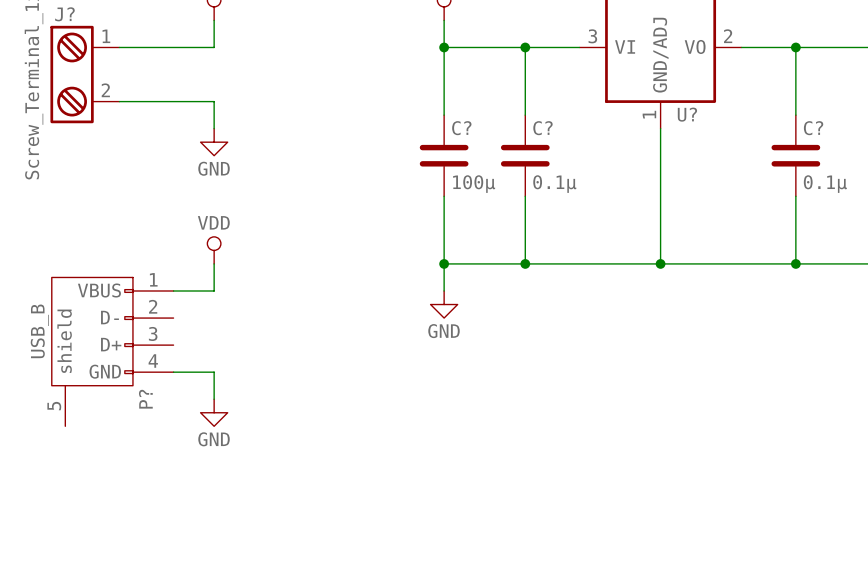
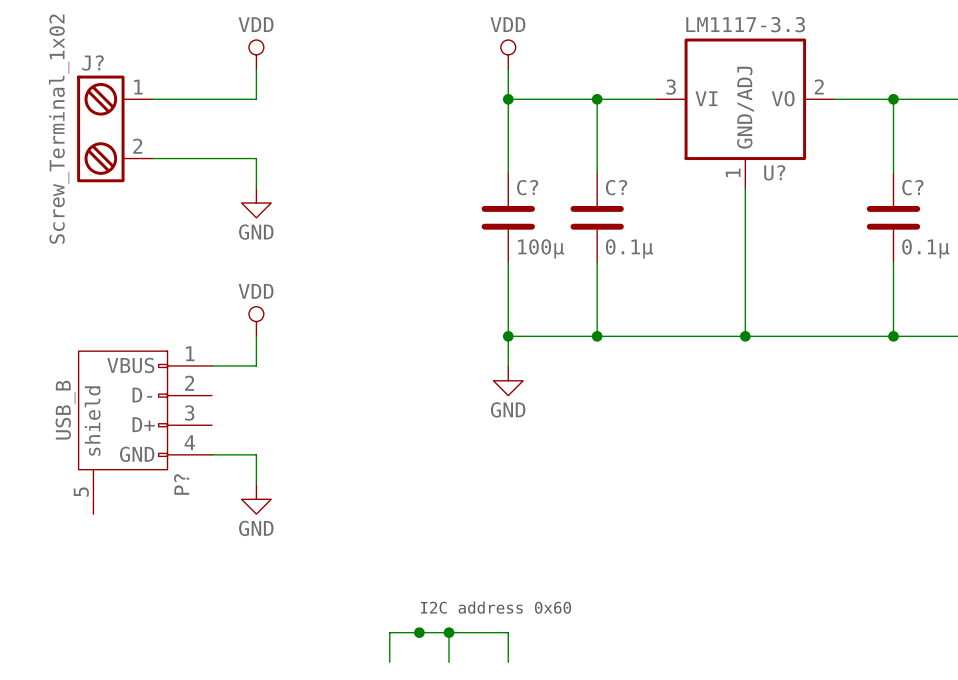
text: none -> I2C address 0x60 (495, 607)
junction: none -> (419, 632)
wire: none -> (449, 632) (449, 662)
junction: none -> (449, 632)
wire: none -> (389, 662) (389, 632) (508, 632) (508, 662)

